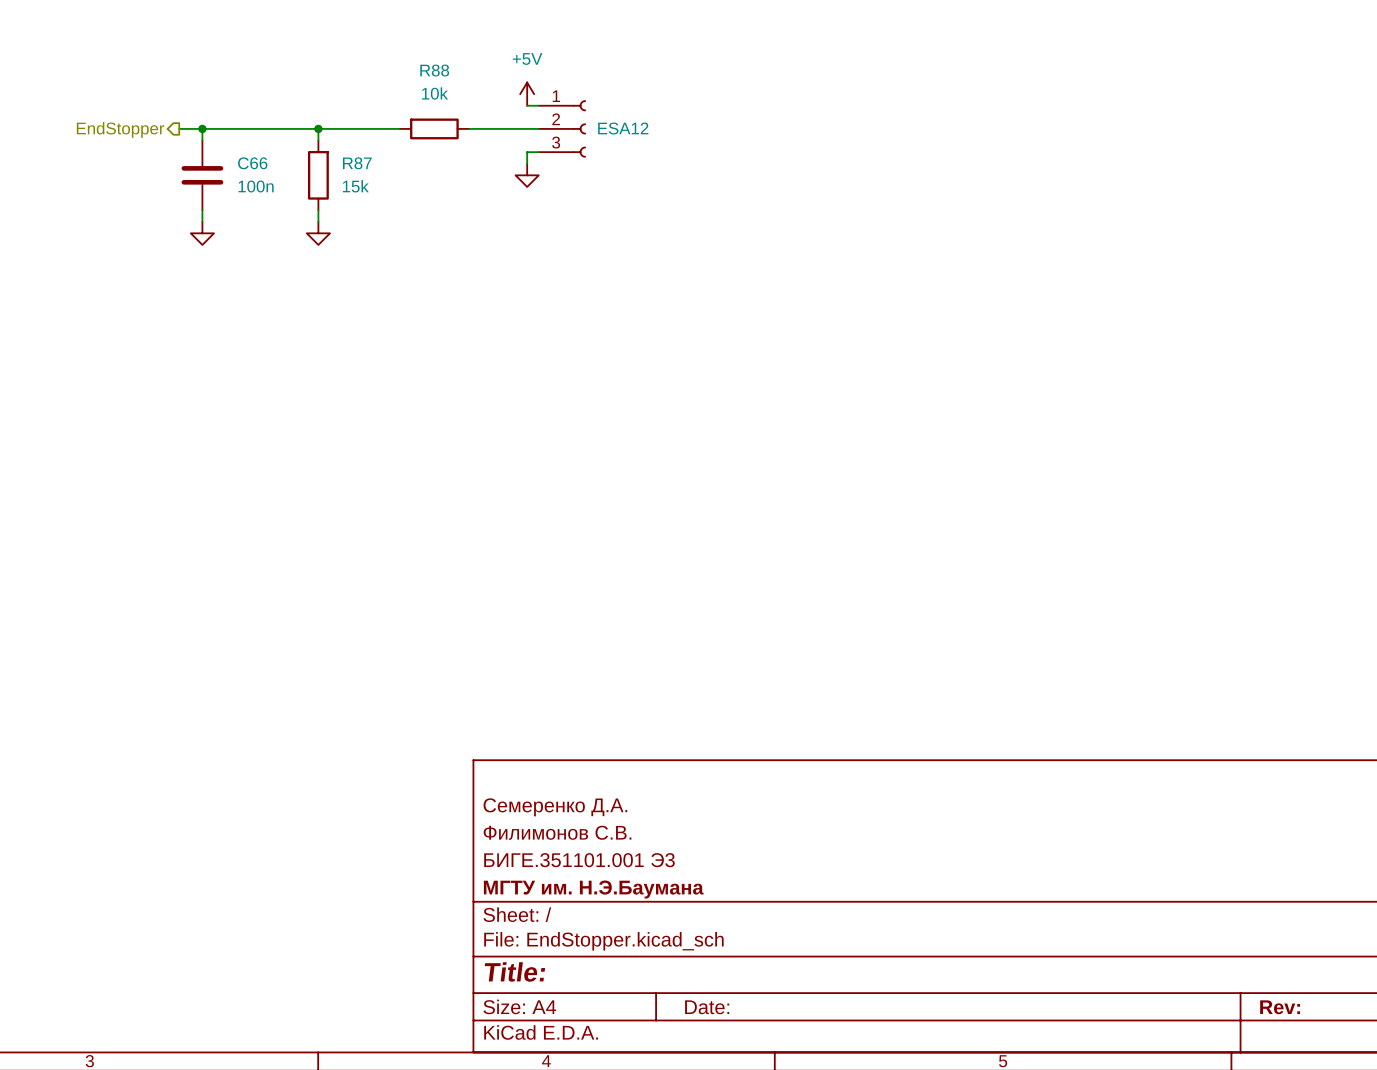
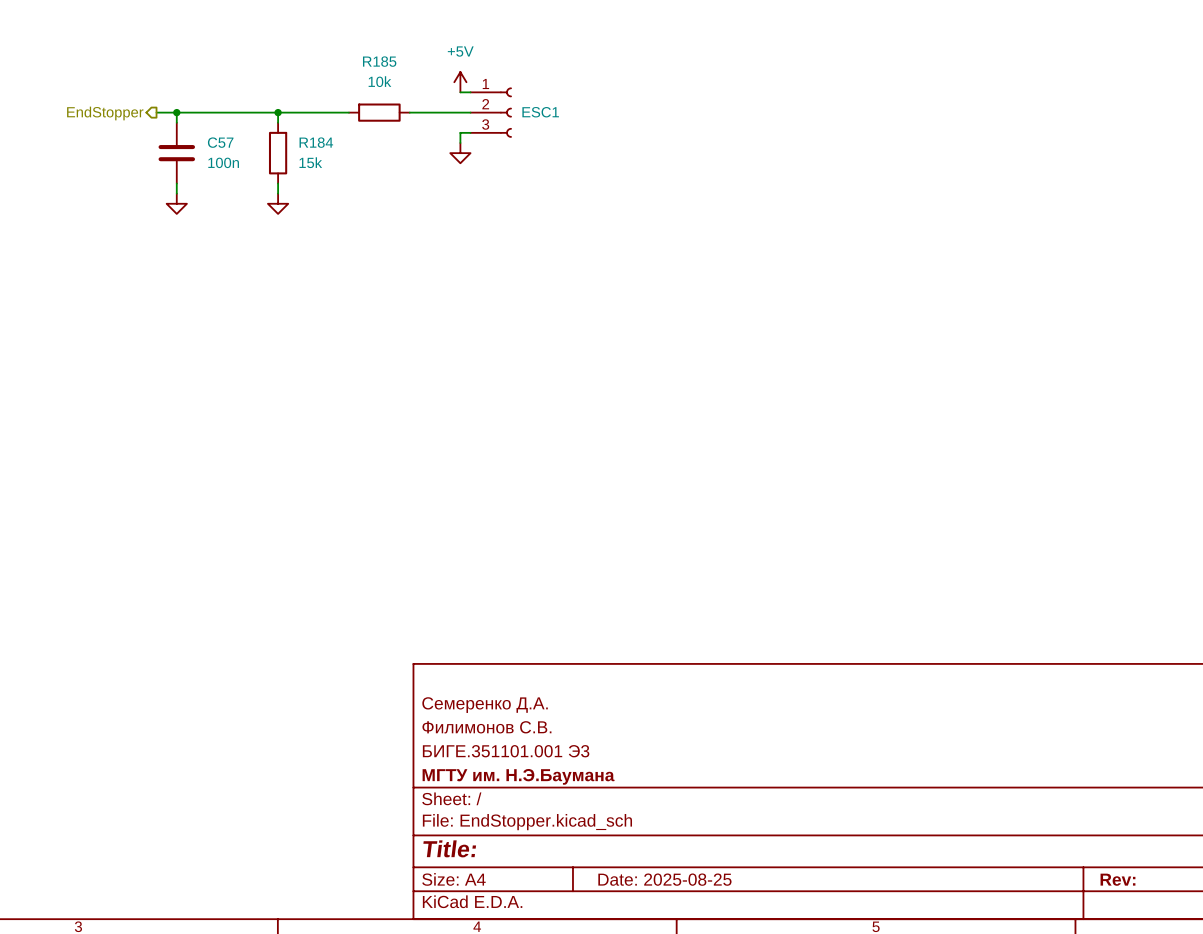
R88 name: R88 (434, 70) -> R185 (379, 61)
ESA12 name: ESA12 (623, 128) -> ESC1 (540, 112)
C66 name: C66 (252, 163) -> C57 (220, 142)
R87 name: R87 (357, 163) -> R184 (316, 142)
title block: Date: (707, 1007) -> Date: 2025-08-25 (664, 879)

